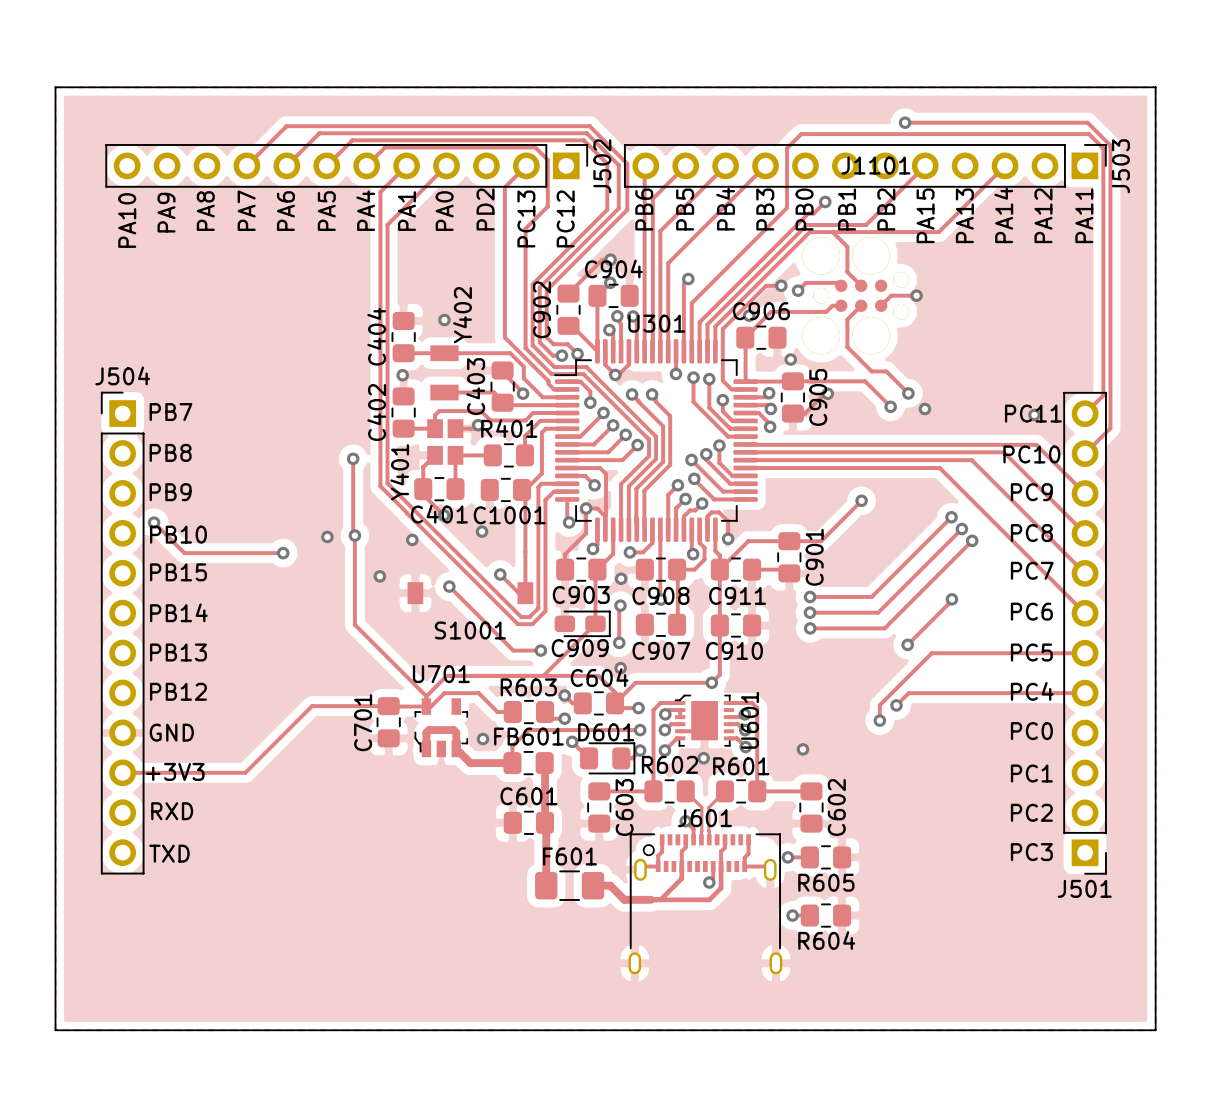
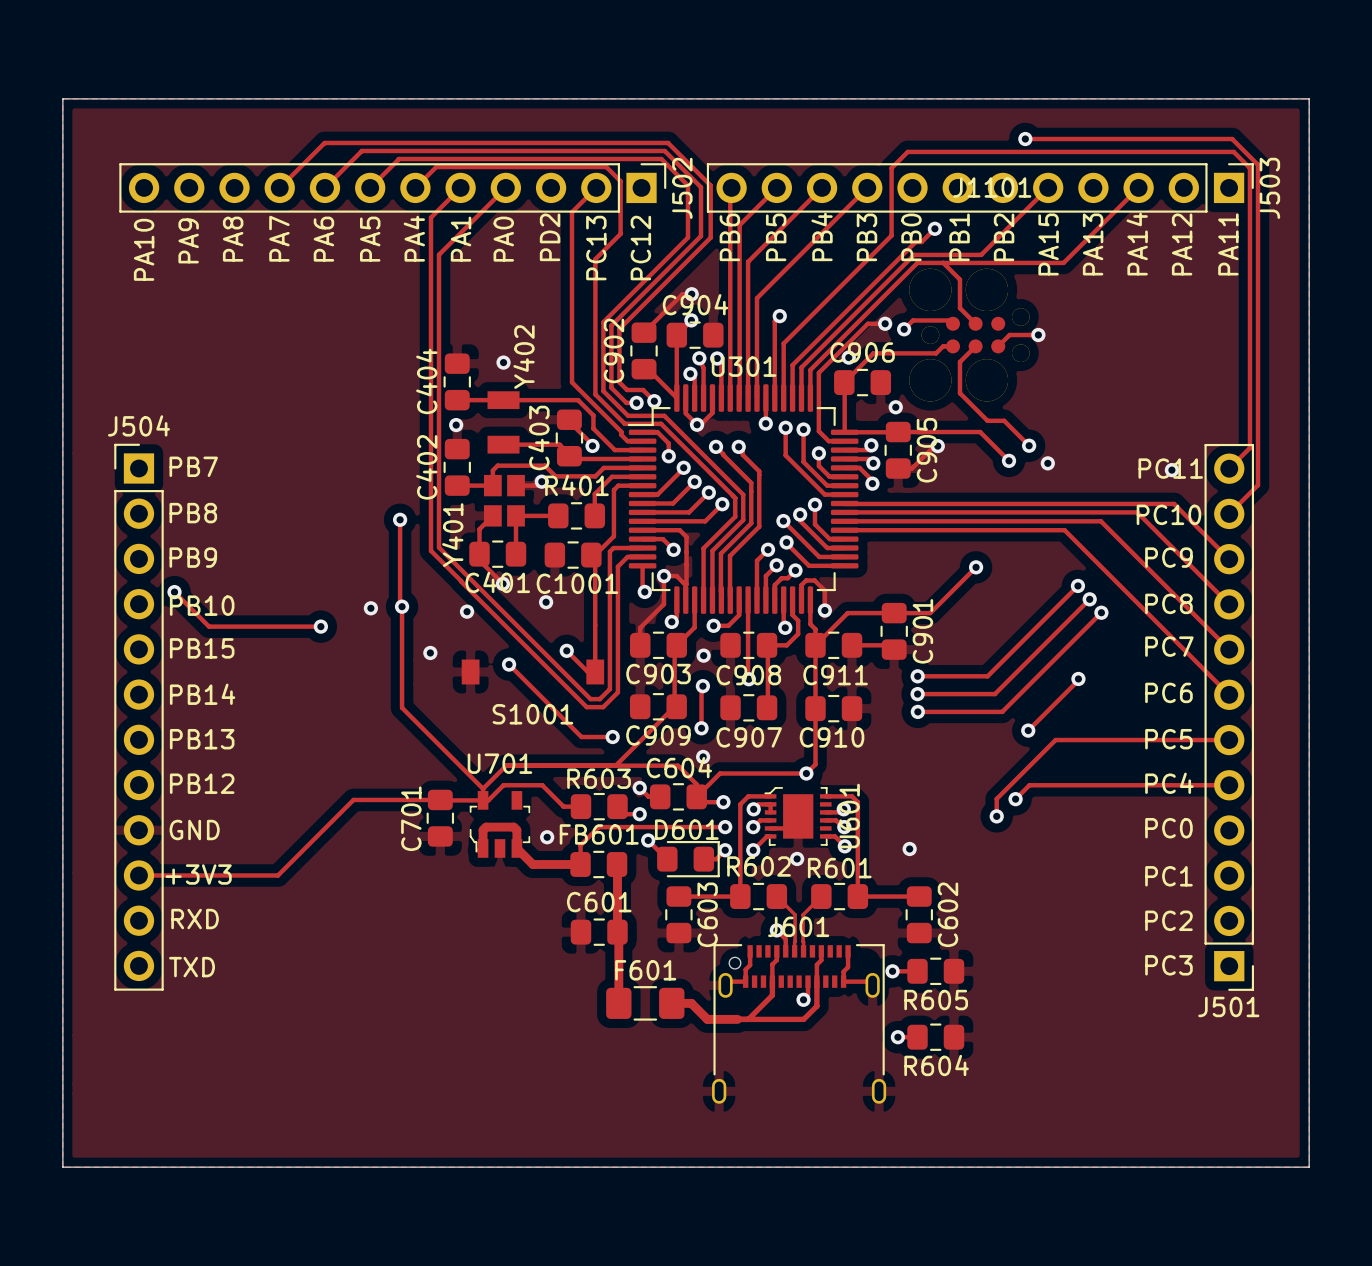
C909 footprint: [554, 610, 611, 638] -> [629, 693, 687, 721]

